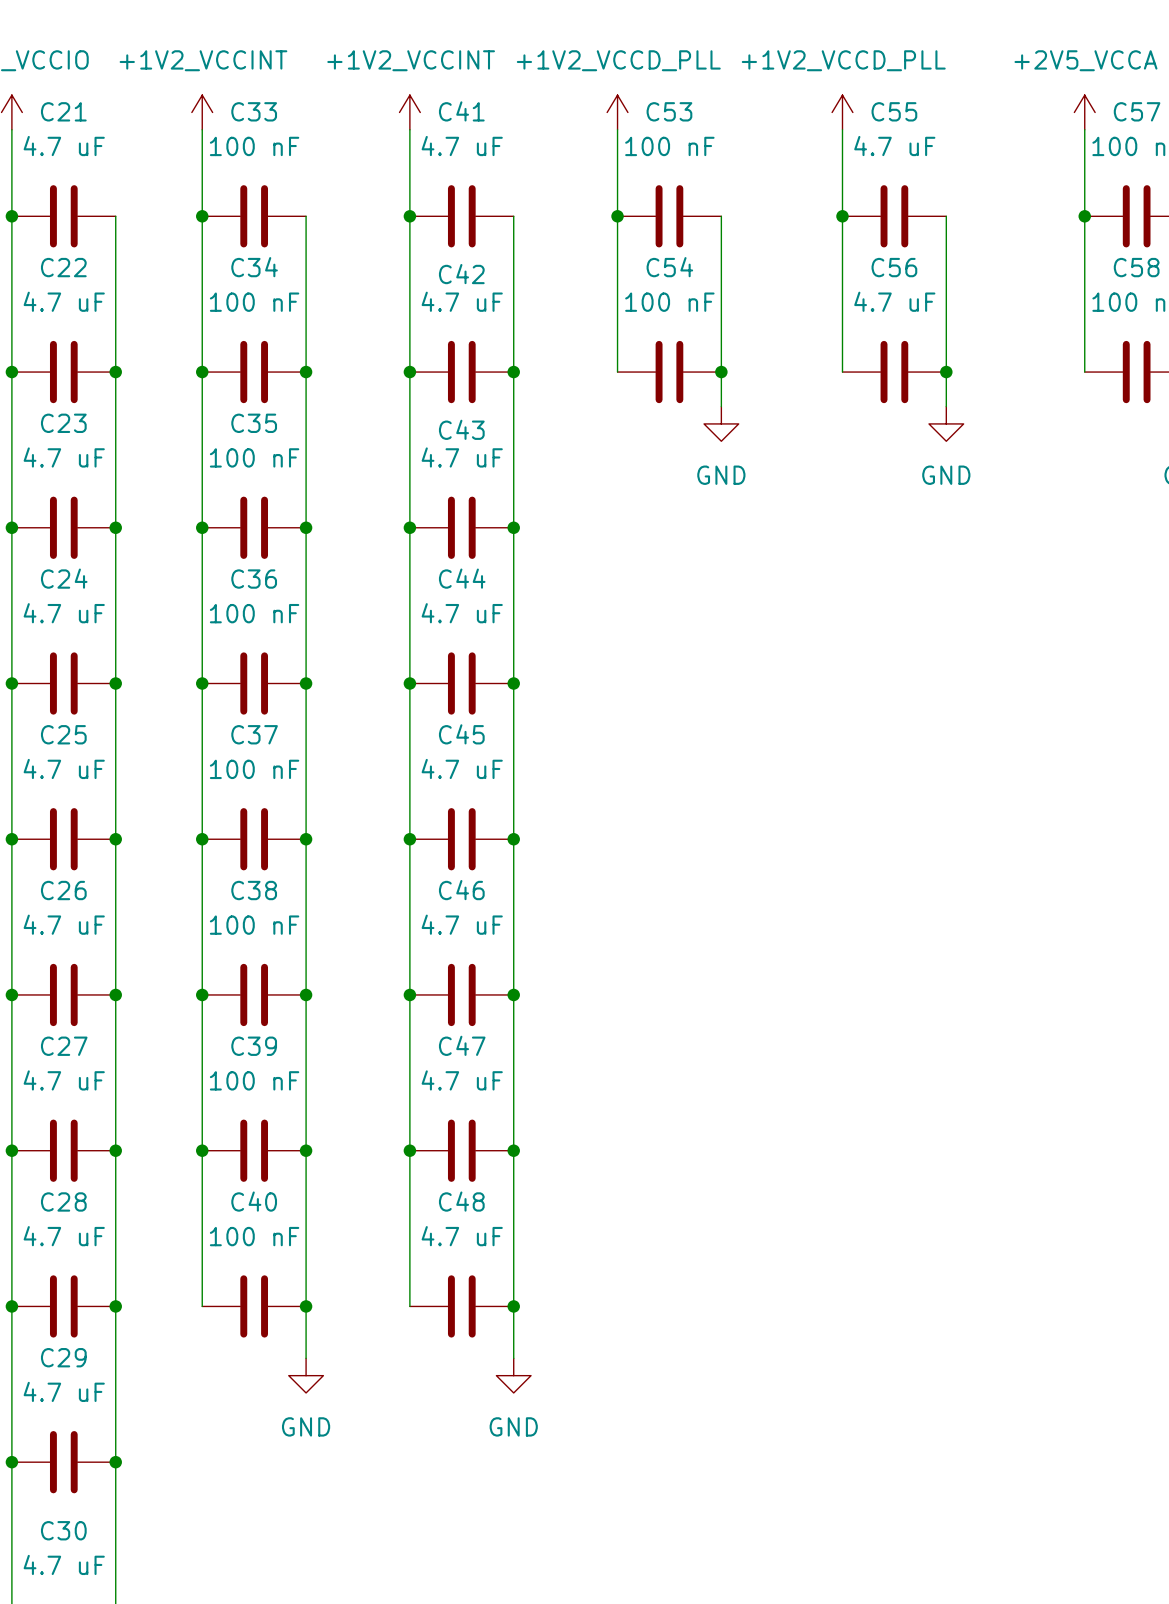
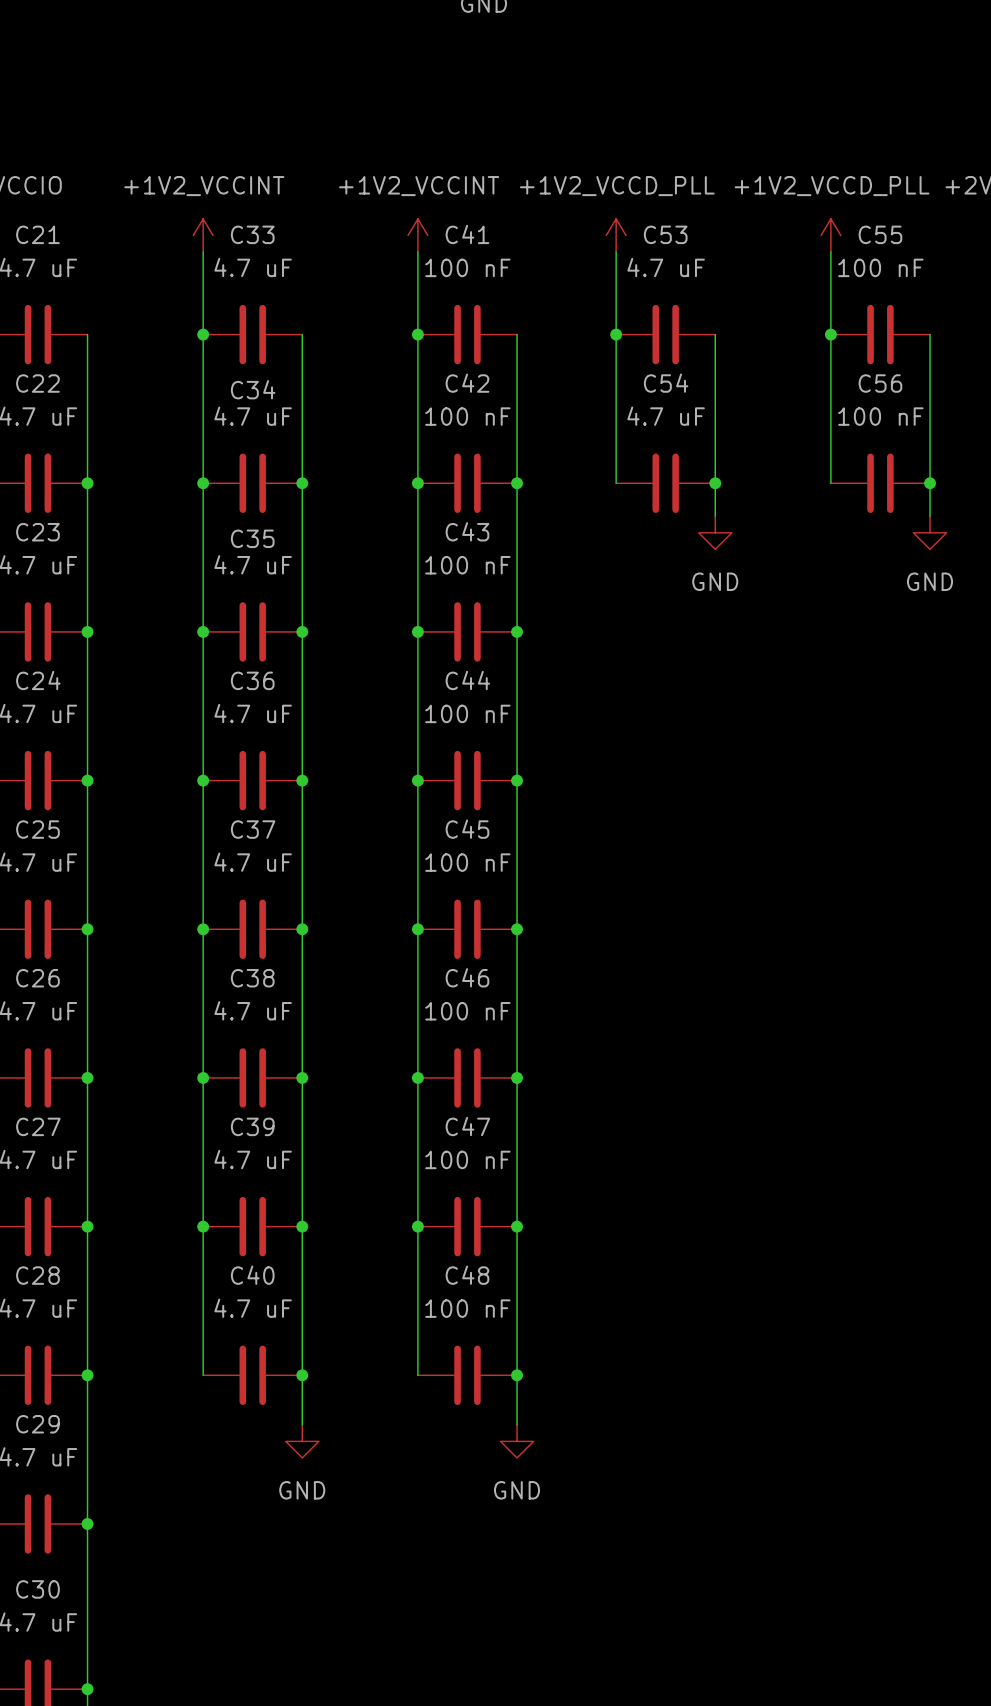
power symbol position: +1V2_VCCINT (202, 112) -> +1V2_VCCINT (203, 235)
power symbol position: +1V2_VCCINT (409, 112) -> +1V2_VCCINT (417, 235)
power symbol position: +1V2_VCCD_PLL (617, 112) -> +1V2_VCCD_PLL (616, 235)
power symbol position: +1V2_VCCD_PLL (842, 112) -> +1V2_VCCD_PLL (830, 235)
wire: (202, 129) (202, 1306) -> (203, 251) (203, 1375)
wire: (409, 129) (409, 1306) -> (417, 251) (417, 1375)
wire: (617, 129) (617, 372) -> (616, 251) (616, 483)
wire: (842, 129) (842, 372) -> (830, 251) (830, 483)
C33 value: 100 nF (254, 146) -> 4.7 uF (253, 267)
C41 value: 4.7 uF (462, 146) -> 100 nF (467, 267)
C53 value: 100 nF (669, 146) -> 4.7 uF (666, 267)
C55 value: 4.7 uF (894, 146) -> 100 nF (880, 267)
junction position: (202, 216) -> (203, 334)
C33 position: (254, 216) -> (252, 334)
wire: (306, 216) (306, 1358) -> (302, 334) (302, 1424)
junction position: (409, 216) -> (417, 334)
C41 position: (461, 216) -> (467, 334)
wire: (513, 216) (513, 1358) -> (517, 334) (517, 1424)
junction position: (617, 216) -> (616, 334)
C53 position: (669, 216) -> (665, 334)
wire: (721, 216) (721, 406) -> (715, 334) (715, 516)
junction position: (842, 216) -> (830, 334)
C55 position: (894, 216) -> (880, 334)
wire: (946, 216) (946, 406) -> (930, 334) (930, 516)
C34 name position: C34 (254, 267) -> C34 (253, 389)
C42 name position: C42 (461, 274) -> C42 (467, 383)
C42 value: 4.7 uF (462, 301) -> 100 nF (467, 416)
C56 value: 4.7 uF (894, 301) -> 100 nF (880, 416)
C34 value: 100 nF (254, 302) -> 4.7 uF (253, 416)
C54 value: 100 nF (669, 302) -> 4.7 uF (666, 416)
junction: (202, 372) -> none
junction: none -> (203, 483)
C34 position: (254, 372) -> (252, 483)
junction: (306, 372) -> none
junction: none -> (302, 483)
junction: (409, 372) -> none
junction: none -> (417, 483)
C42 position: (461, 372) -> (467, 483)
junction: (513, 372) -> none
junction: none -> (517, 483)
C54 position: (669, 372) -> (665, 483)
junction position: (721, 372) -> (715, 483)
C56 position: (894, 372) -> (880, 483)
junction position: (946, 372) -> (930, 483)
C35 name position: C35 (254, 423) -> C35 (252, 538)
power symbol position: GND (721, 423) -> GND (715, 532)
power symbol position: GND (946, 423) -> GND (930, 532)
C43 name position: C43 (461, 429) -> C43 (467, 531)
C35 value: 100 nF (254, 457) -> 4.7 uF (253, 564)
C43 value: 4.7 uF (462, 457) -> 100 nF (467, 565)
junction: (202, 527) -> none
junction: none -> (203, 631)
C35 position: (254, 527) -> (252, 631)
junction: (306, 527) -> none
junction: none -> (302, 631)
junction: (409, 527) -> none
junction: none -> (417, 631)
C43 position: (461, 527) -> (467, 631)
junction: (513, 527) -> none
junction: none -> (517, 631)
C36 value: 100 nF (254, 613) -> 4.7 uF (253, 713)
C44 value: 4.7 uF (462, 613) -> 100 nF (467, 713)
junction: (202, 683) -> none
junction: none -> (203, 780)
C36 position: (254, 683) -> (252, 780)
junction: (306, 683) -> none
junction: none -> (302, 780)
junction: (409, 683) -> none
junction: none -> (417, 780)
C44 position: (461, 683) -> (467, 780)
junction: (513, 683) -> none
junction: none -> (517, 780)
C45 value: 4.7 uF (462, 768) -> 100 nF (467, 862)
C37 value: 100 nF (254, 769) -> 4.7 uF (253, 862)
junction: (202, 839) -> none
junction: none -> (203, 929)
C37 position: (254, 839) -> (252, 929)
junction: (306, 839) -> none
junction: none -> (302, 929)
junction: (409, 839) -> none
junction: none -> (417, 929)
C45 position: (461, 839) -> (467, 929)
junction: (513, 839) -> none
junction: none -> (517, 929)
C46 value: 4.7 uF (462, 924) -> 100 nF (467, 1011)
C38 value: 100 nF (254, 925) -> 4.7 uF (253, 1010)
junction: (202, 994) -> none
junction: none -> (203, 1077)
C38 position: (254, 994) -> (252, 1077)
junction: (306, 994) -> none
junction: none -> (302, 1077)
junction: (409, 994) -> none
junction: none -> (417, 1077)
C46 position: (461, 994) -> (467, 1077)
junction: (513, 994) -> none
junction: none -> (517, 1077)
C39 value: 100 nF (254, 1080) -> 4.7 uF (253, 1159)
C47 value: 4.7 uF (462, 1080) -> 100 nF (467, 1159)
junction: (202, 1150) -> none
junction: none -> (203, 1226)
C39 position: (254, 1150) -> (252, 1226)
junction: (306, 1150) -> none
junction: none -> (302, 1226)
junction: (409, 1150) -> none
junction: none -> (417, 1226)
C47 position: (461, 1150) -> (467, 1226)
junction: (513, 1150) -> none
junction: none -> (517, 1226)
C40 value: 100 nF (254, 1236) -> 4.7 uF (253, 1308)
C48 value: 4.7 uF (462, 1236) -> 100 nF (467, 1308)
C40 position: (254, 1306) -> (252, 1375)
junction position: (306, 1306) -> (302, 1375)
C48 position: (461, 1306) -> (467, 1375)
junction position: (513, 1306) -> (517, 1375)
power symbol position: GND (306, 1375) -> GND (302, 1441)
power symbol position: GND (513, 1375) -> GND (517, 1441)

